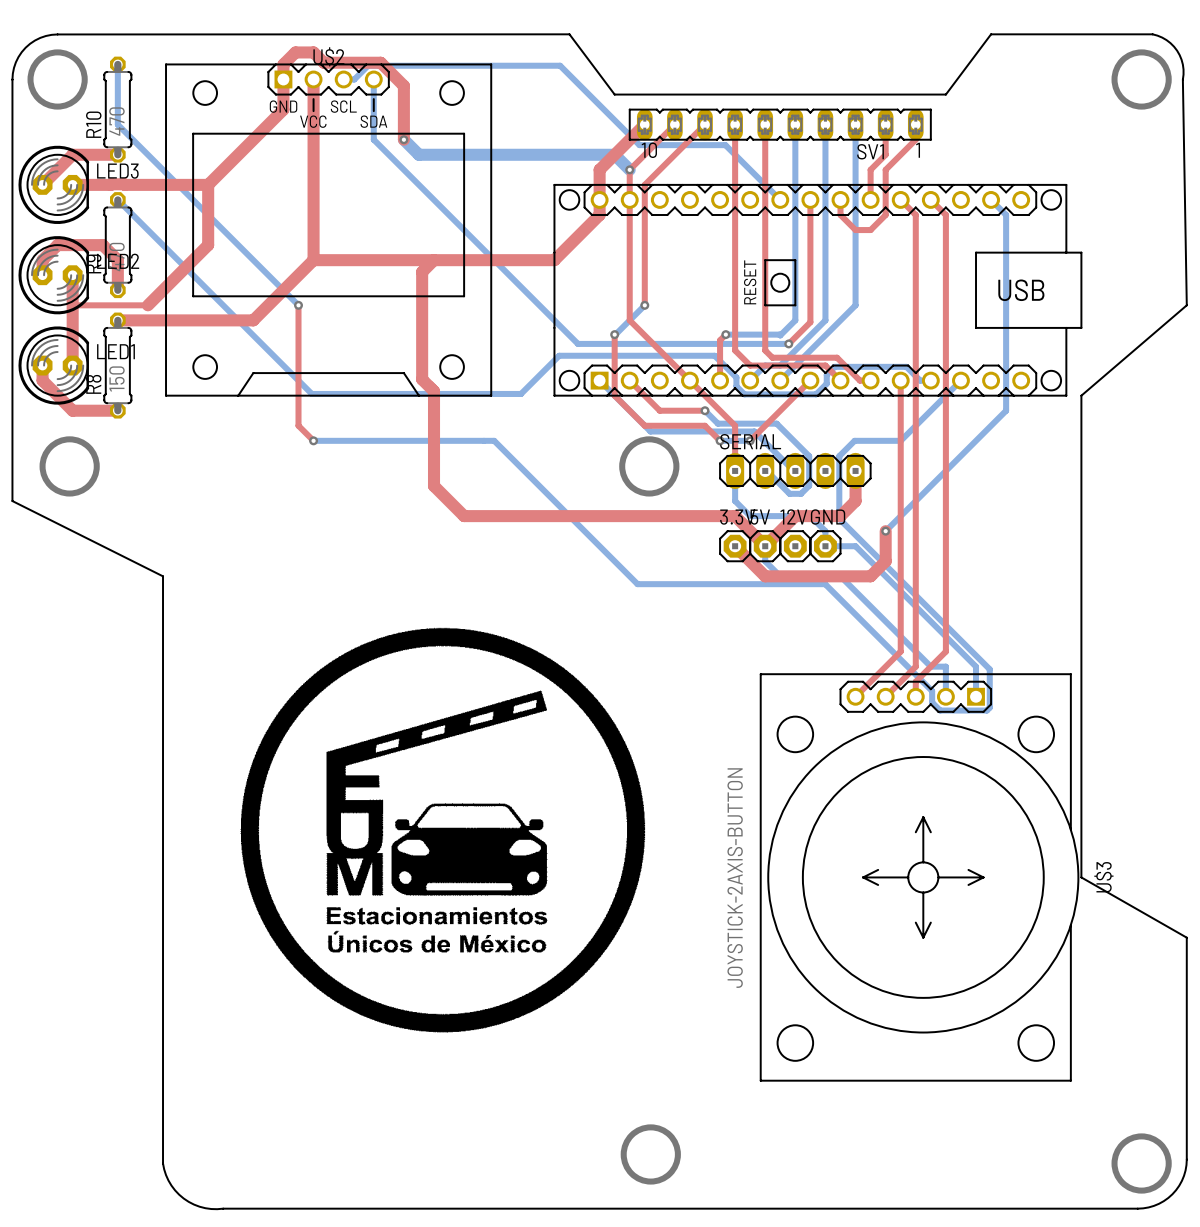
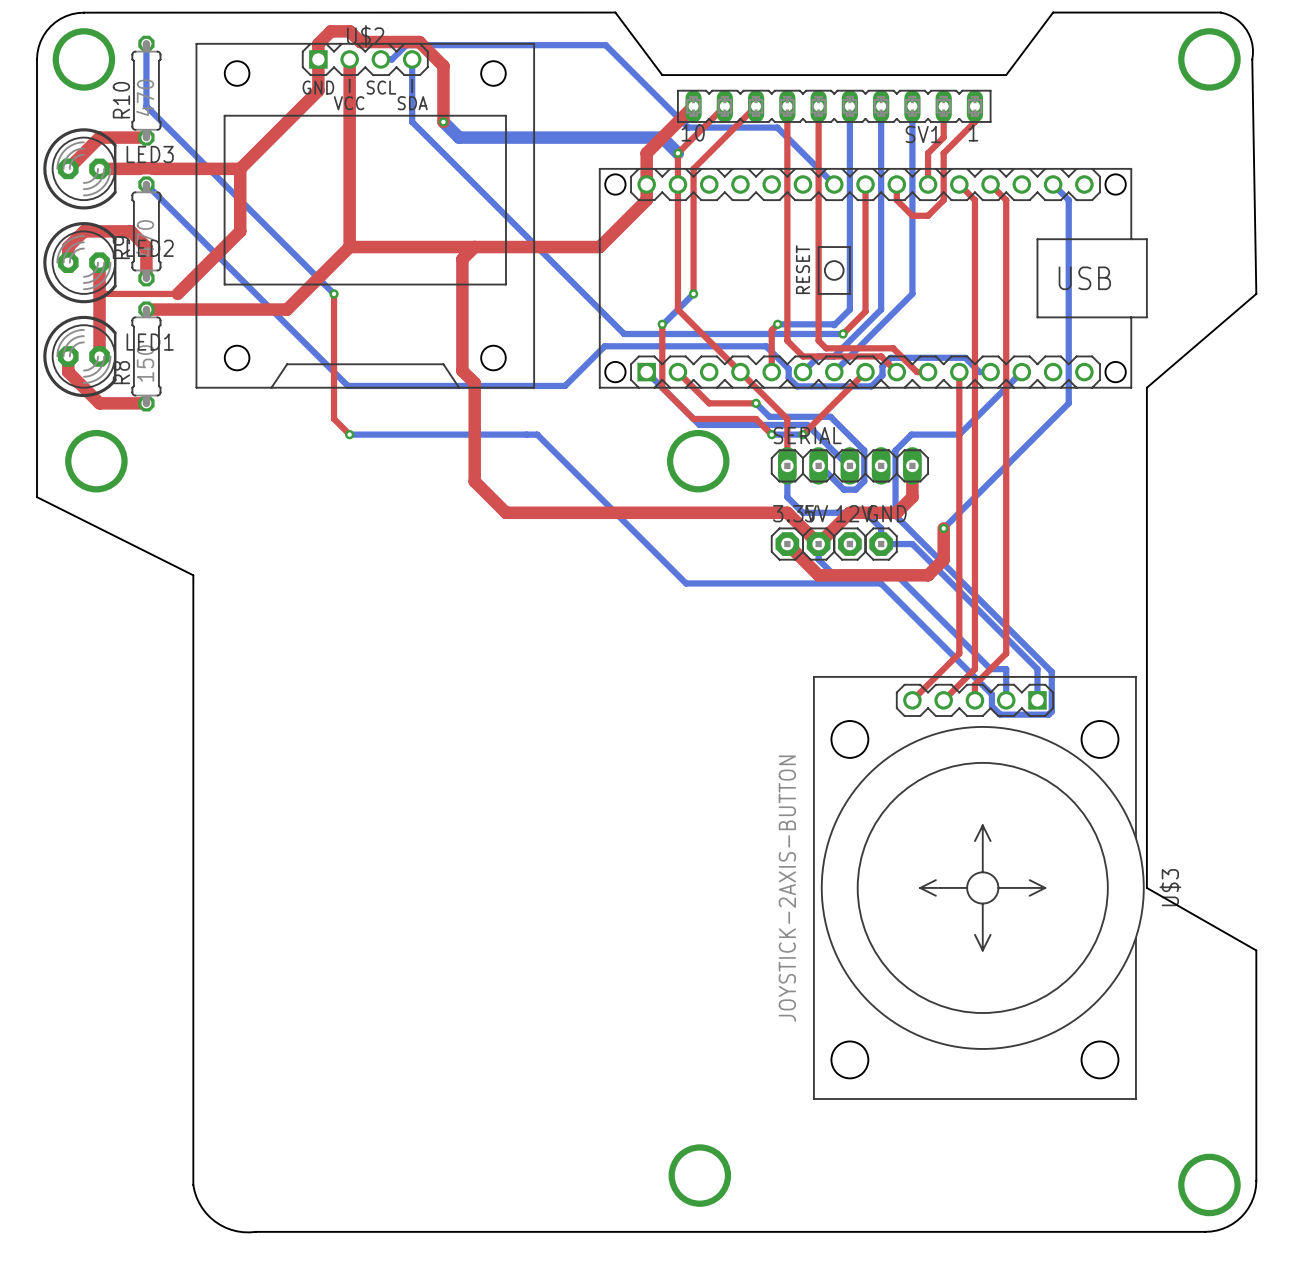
drawing: [240, 627, 646, 1033] -> none

